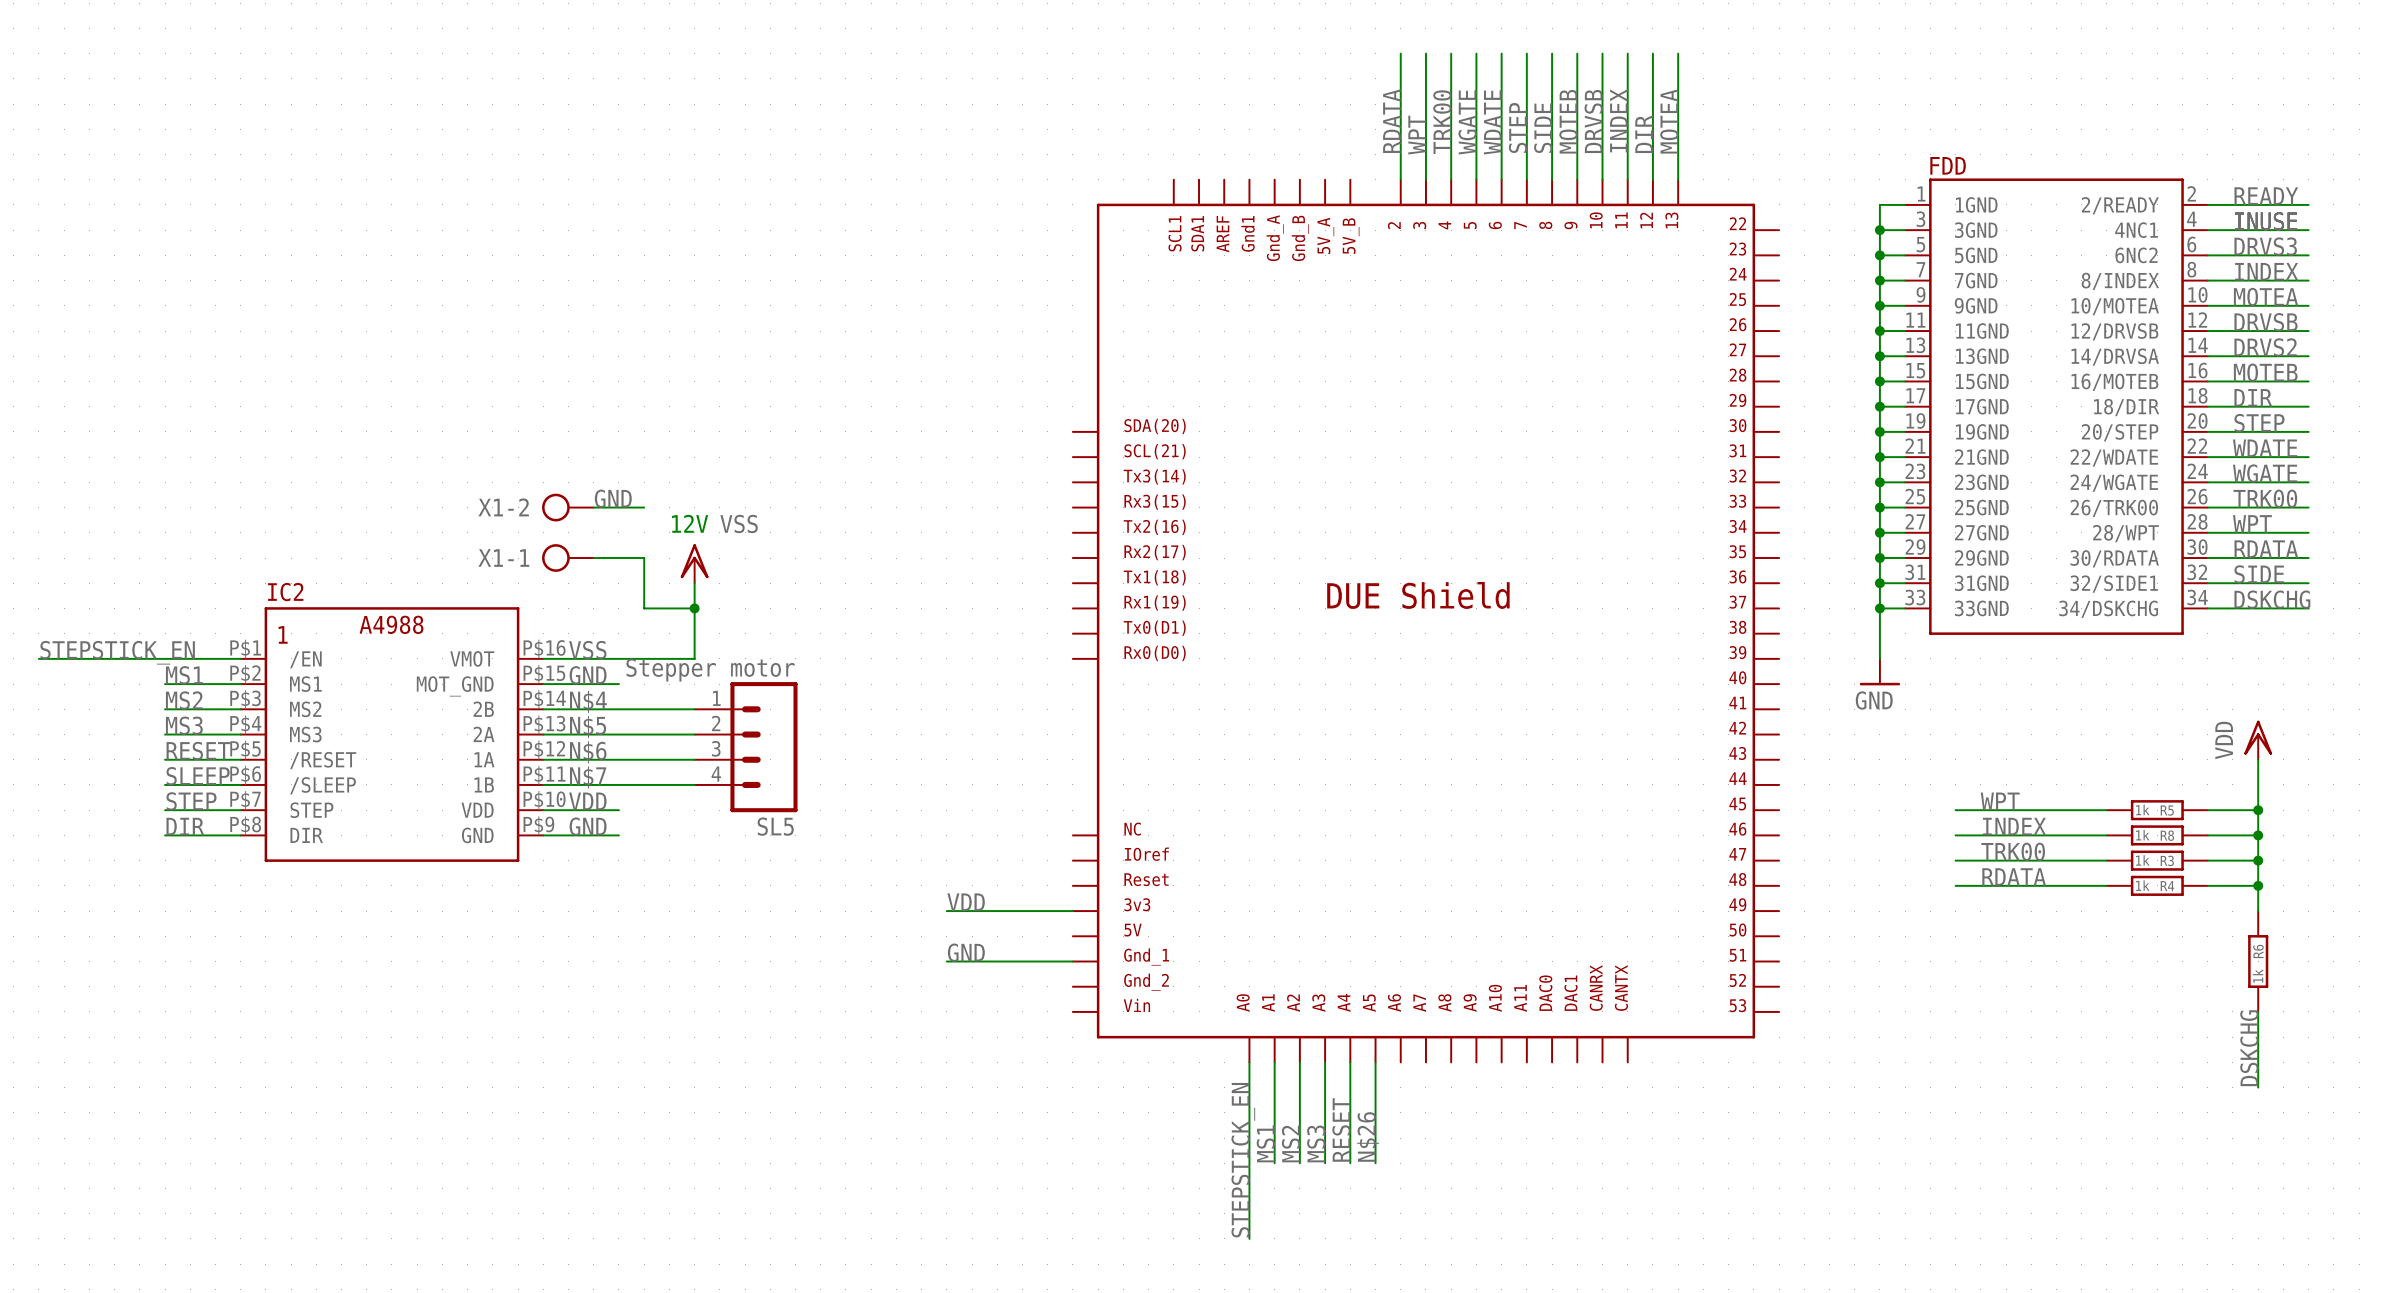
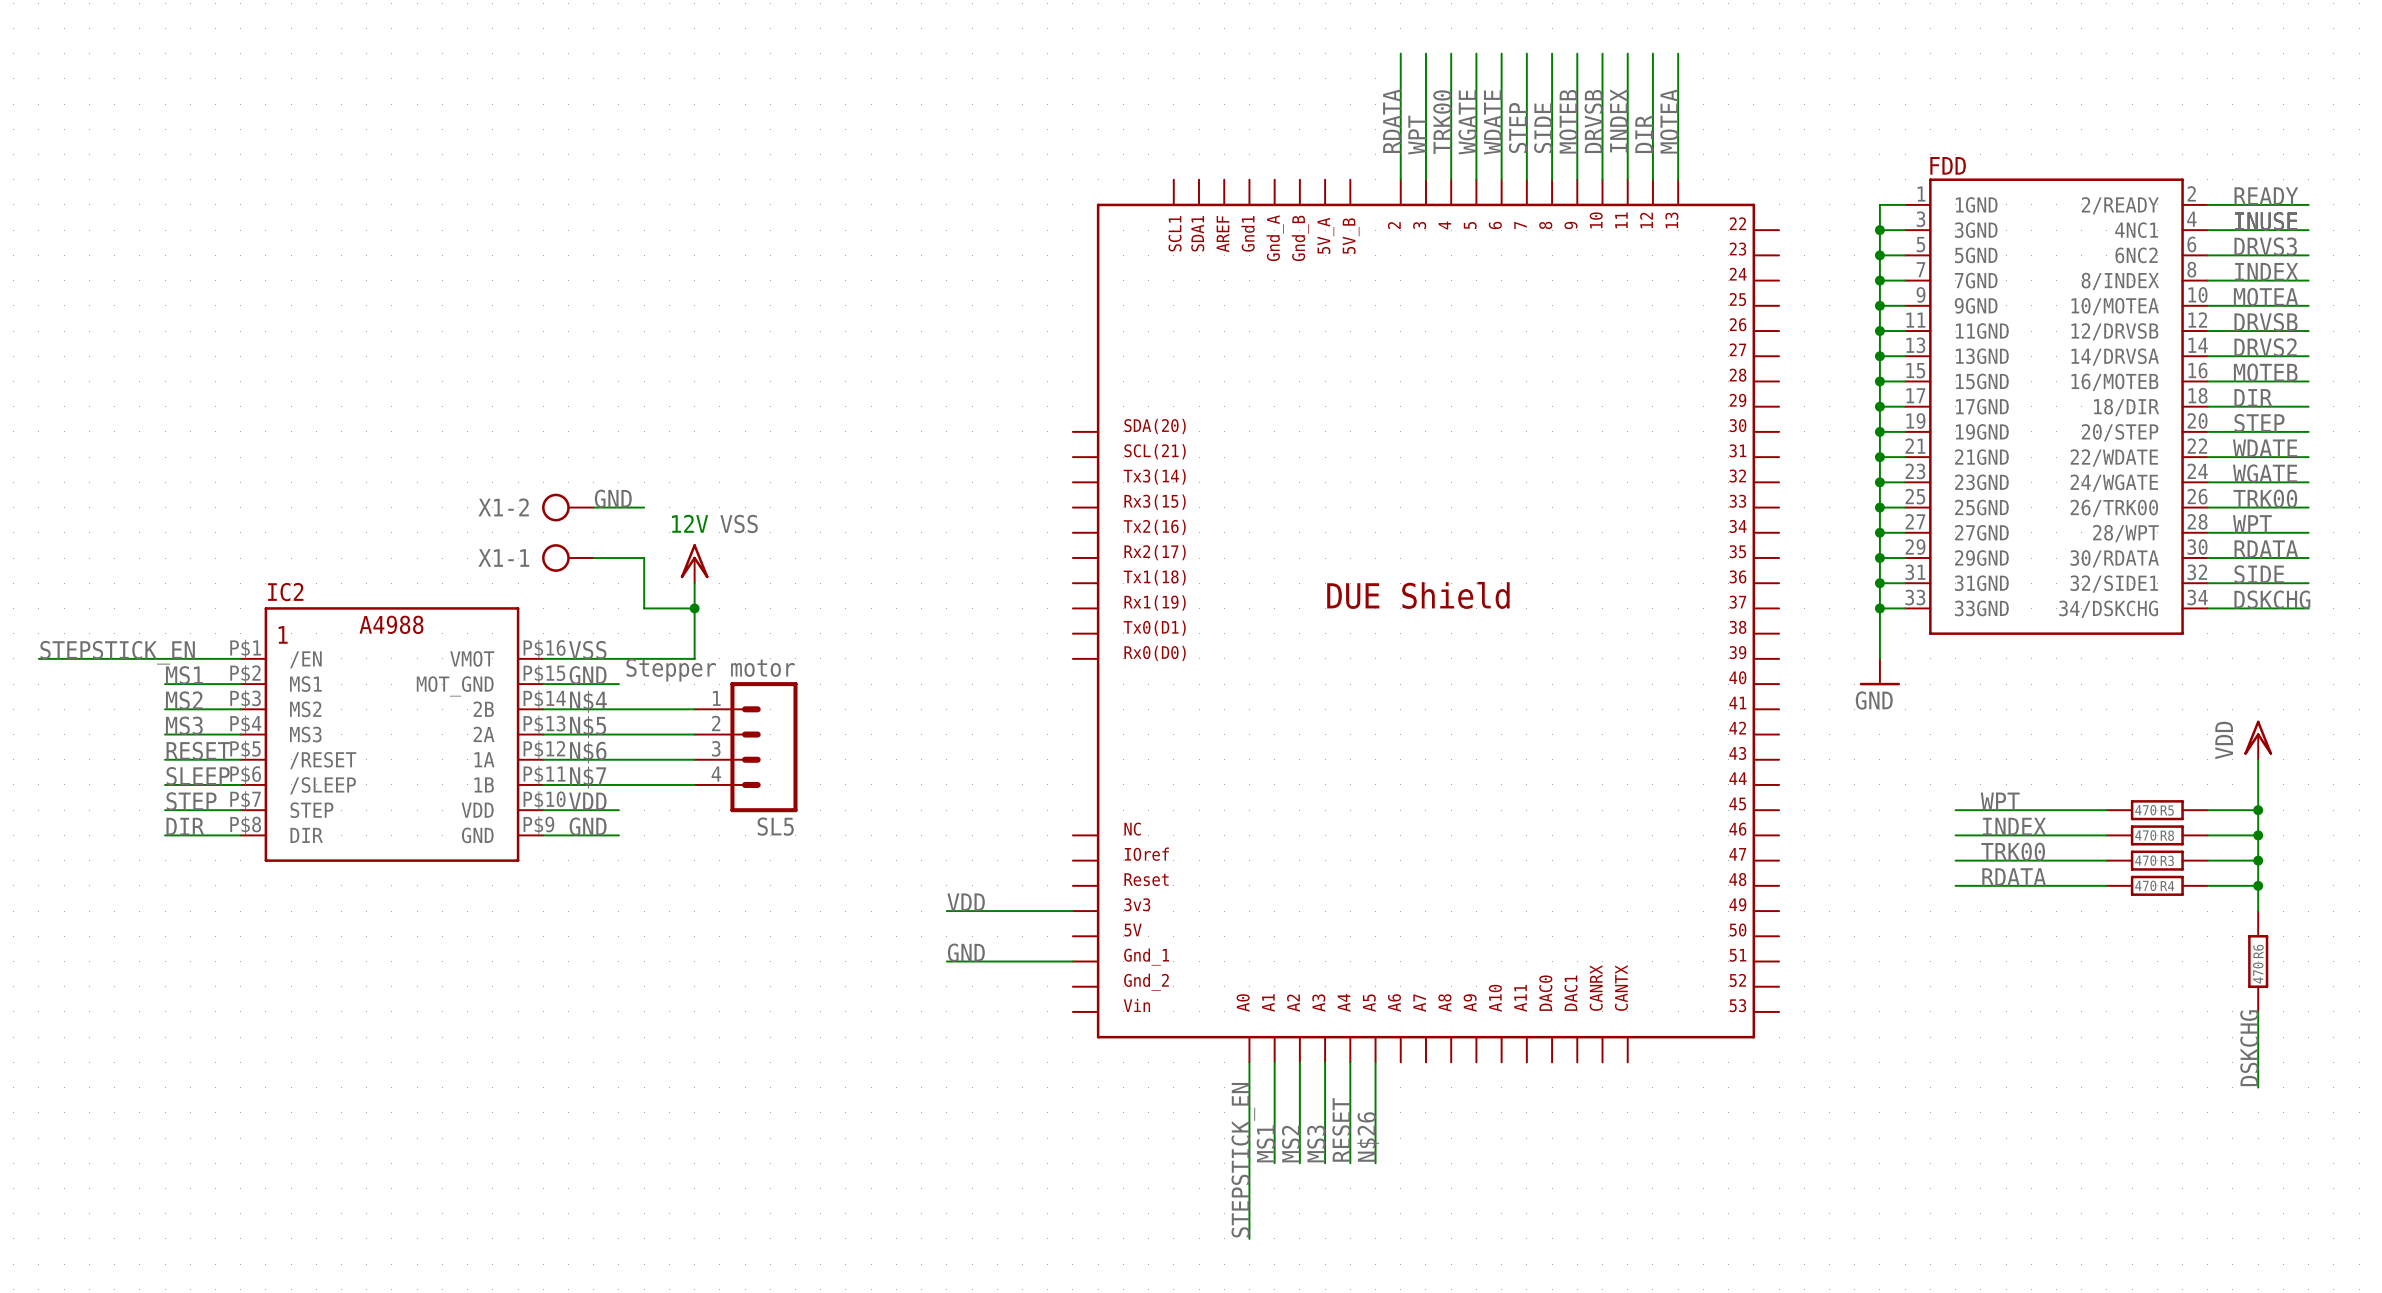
R5 value: 1k (2142, 809) -> 470 (2145, 810)
R8 value: 1k (2142, 835) -> 470 (2145, 835)
R3 value: 1k (2142, 860) -> 470 (2145, 860)
R4 value: 1k (2142, 885) -> 470 (2145, 885)
R6 value: 1k (2257, 976) -> 470 (2258, 973)

